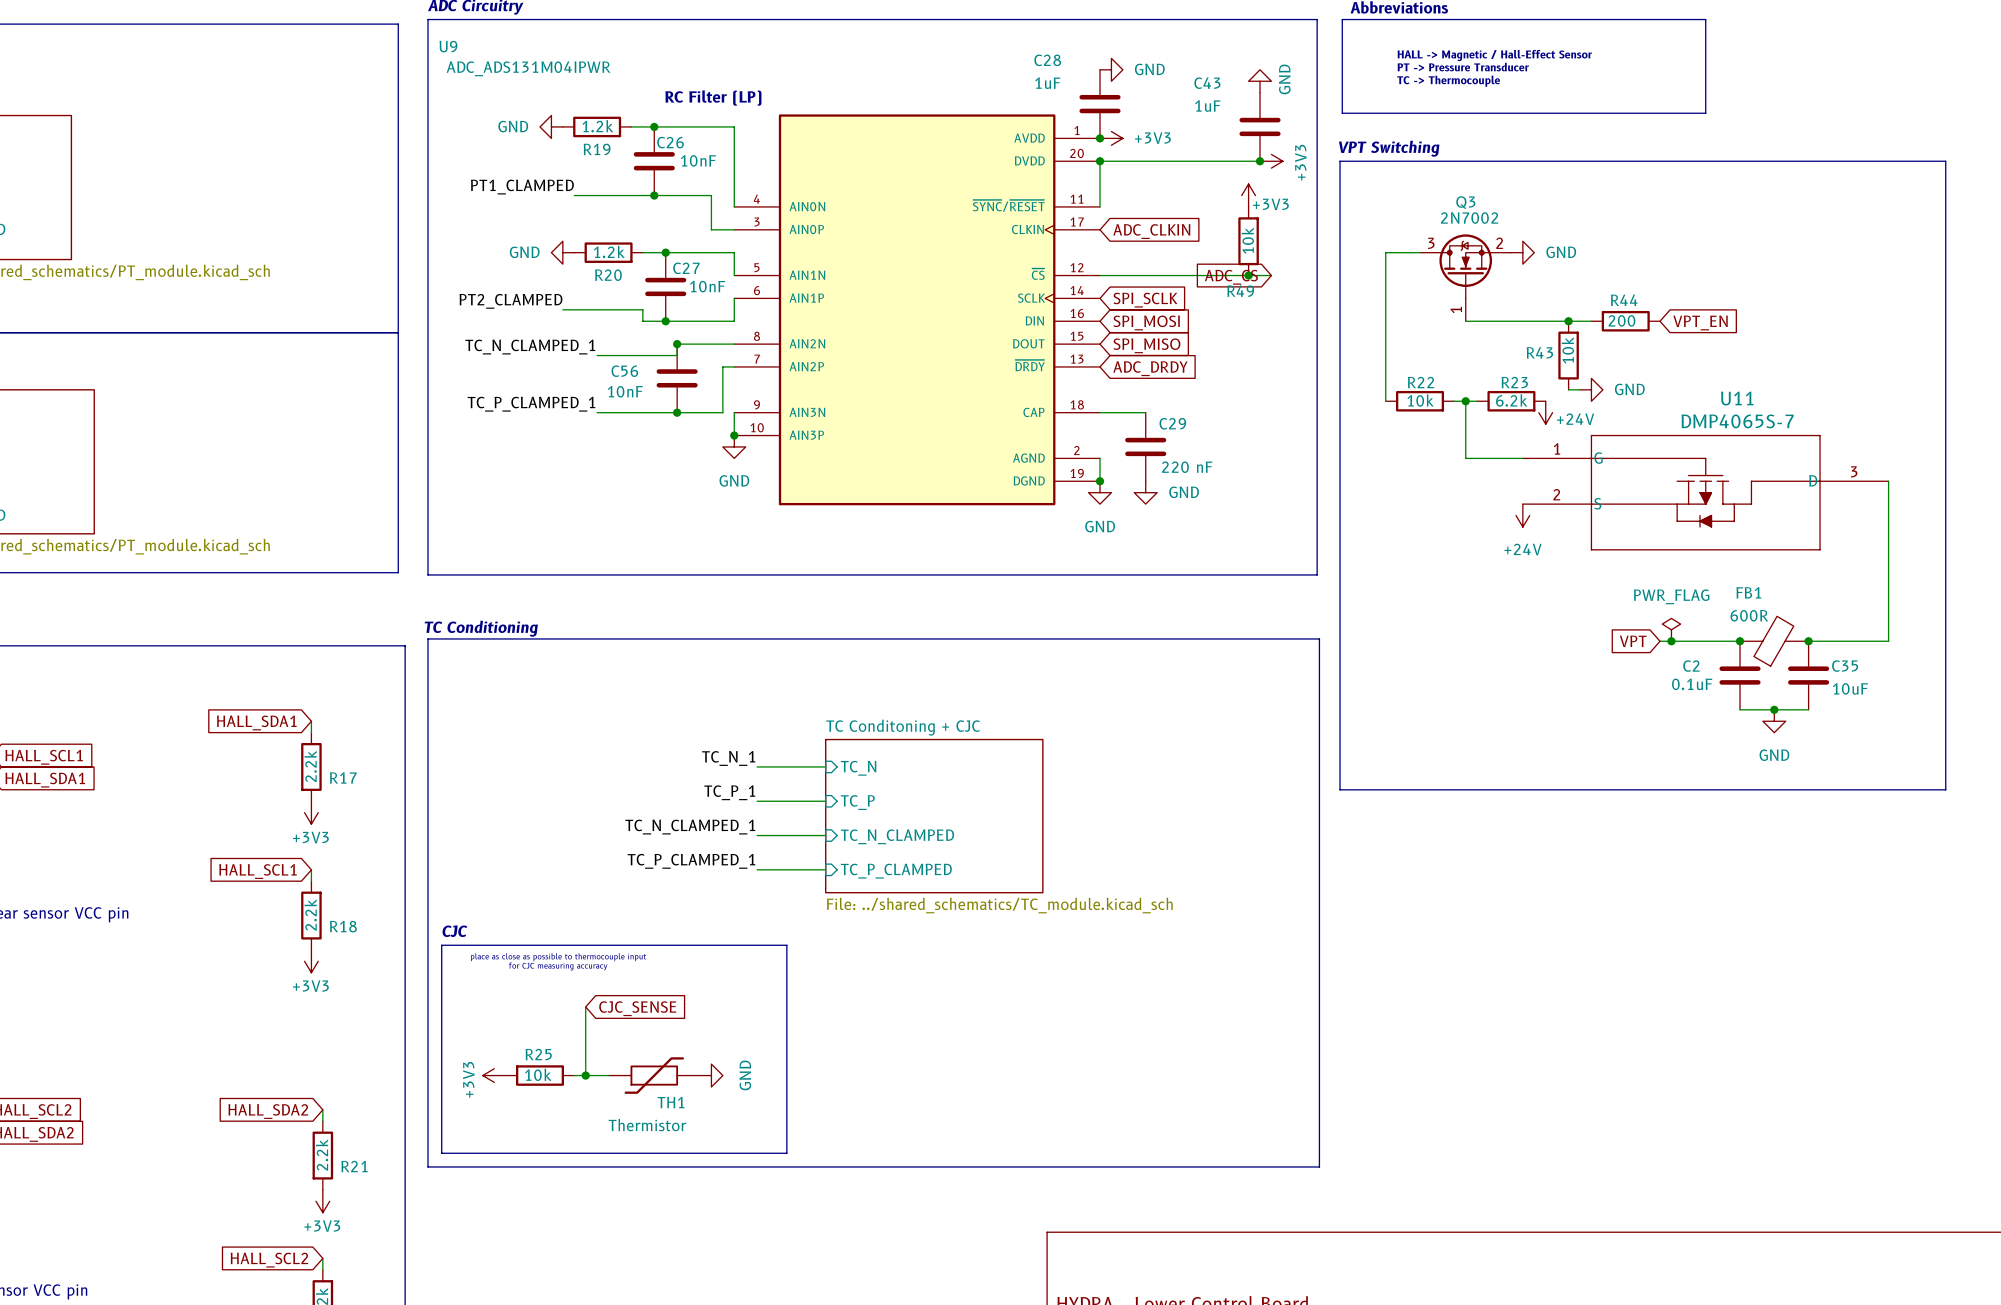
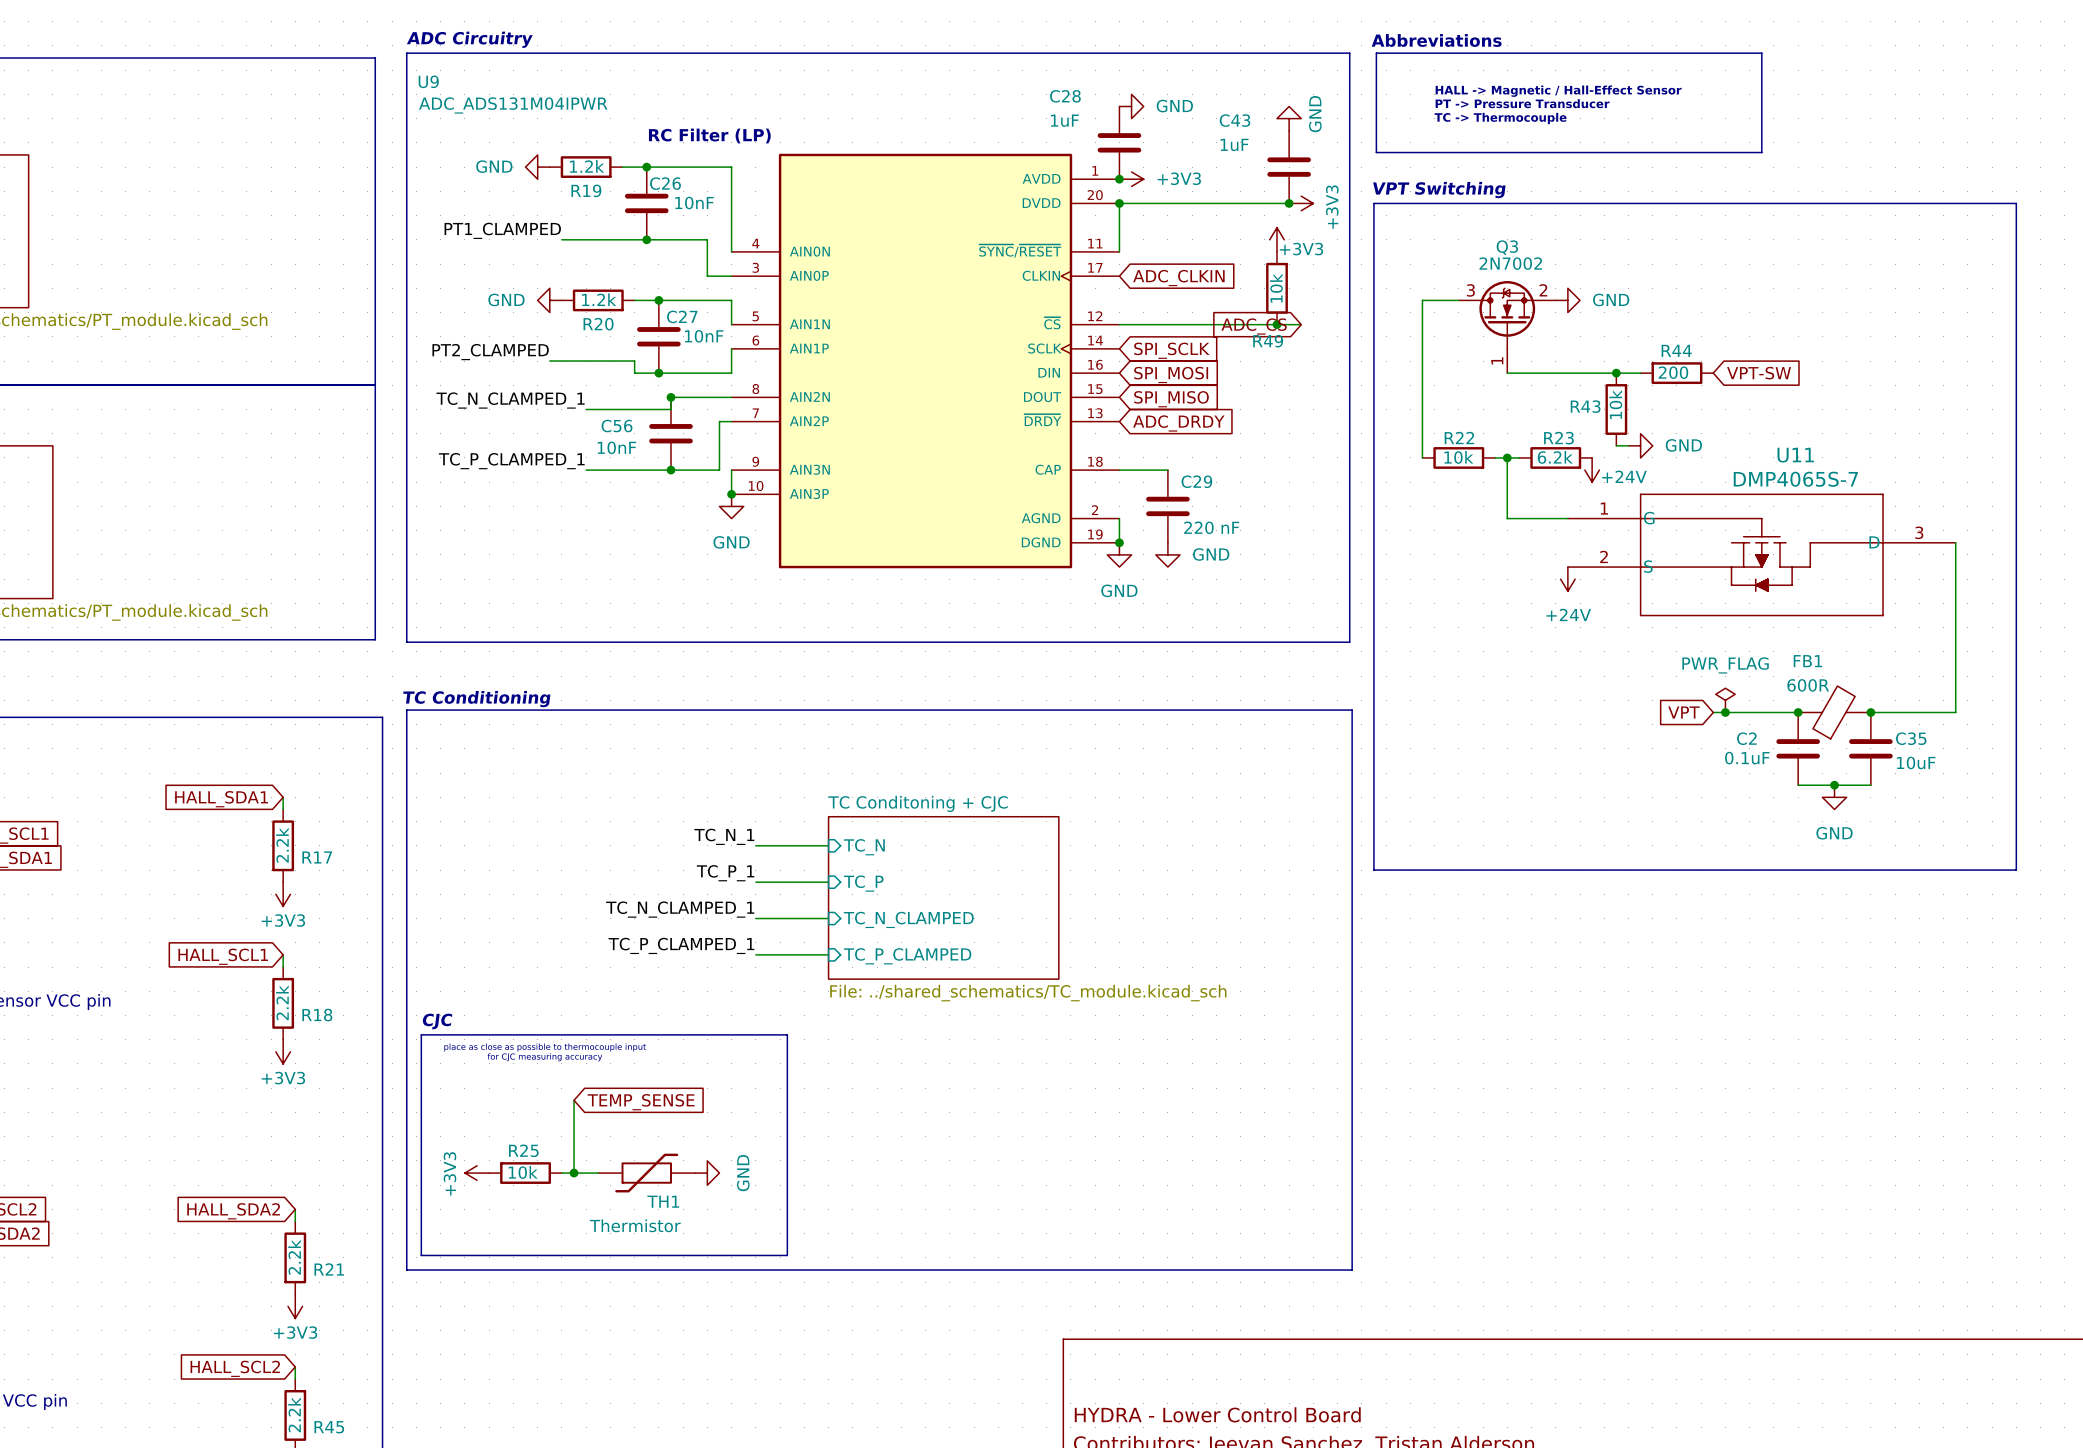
global label: VPT_EN (1700, 322) -> VPT-SW (1759, 373)
global label: CJC_SENSE (637, 1008) -> TEMP_SENSE (641, 1102)

